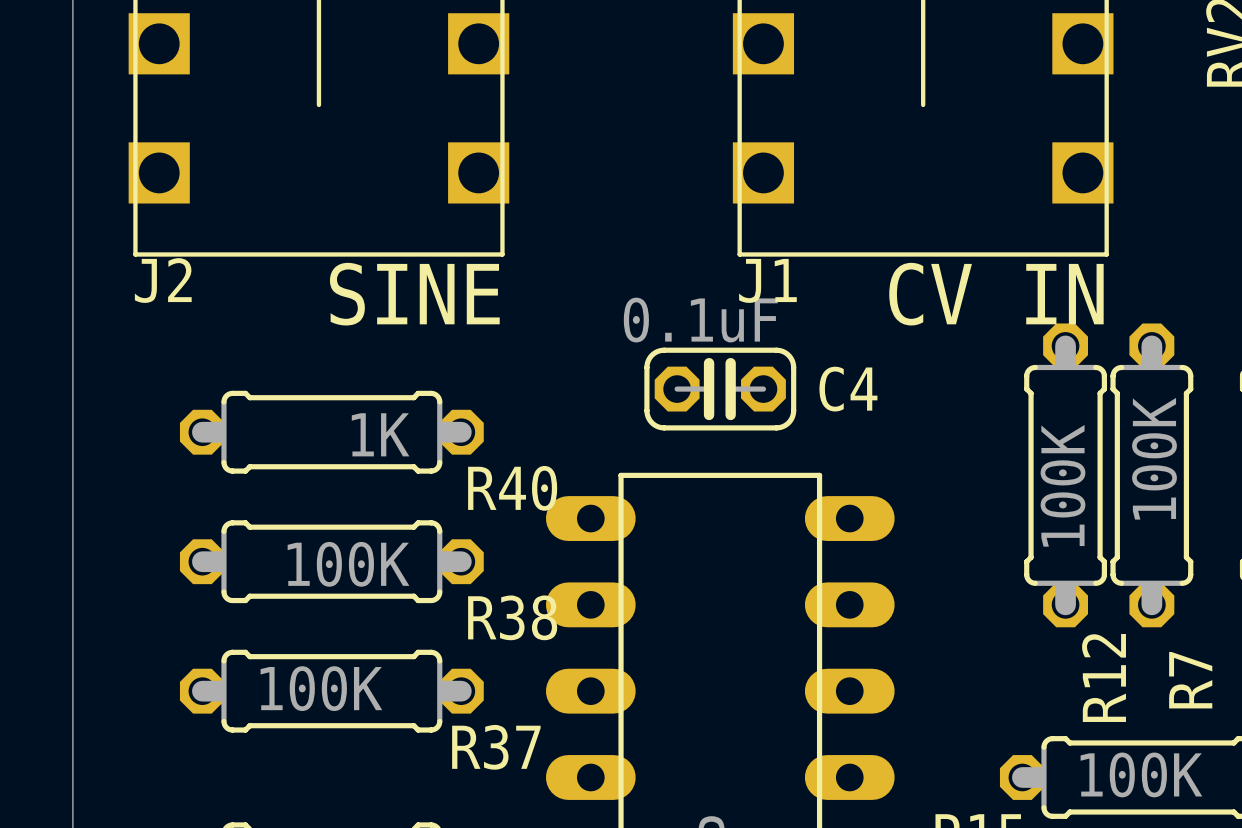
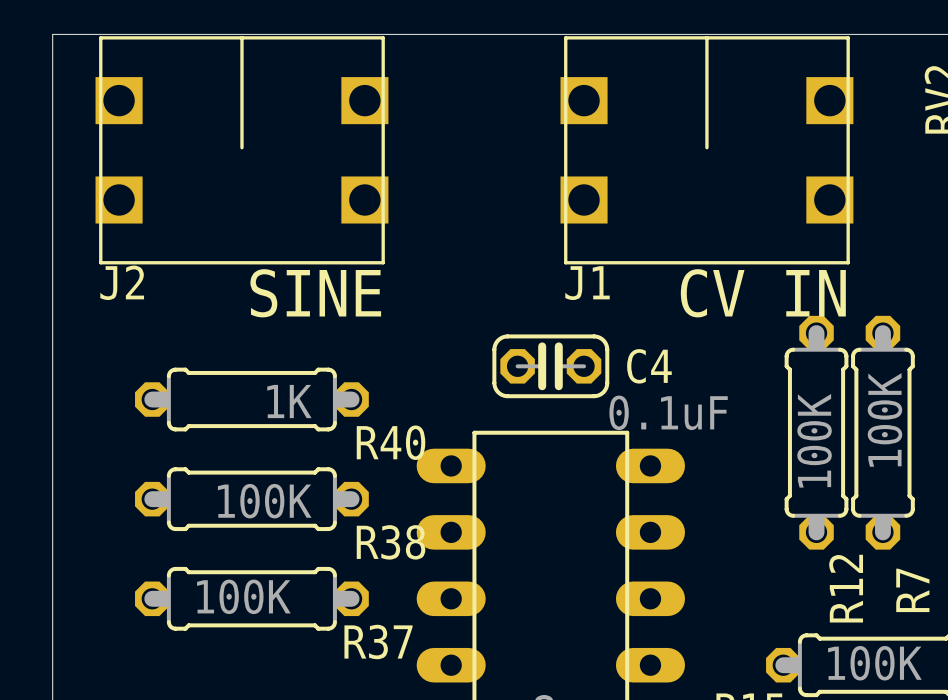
C4 value position: 0.1uF (700, 320) -> 0.1uF (668, 412)

